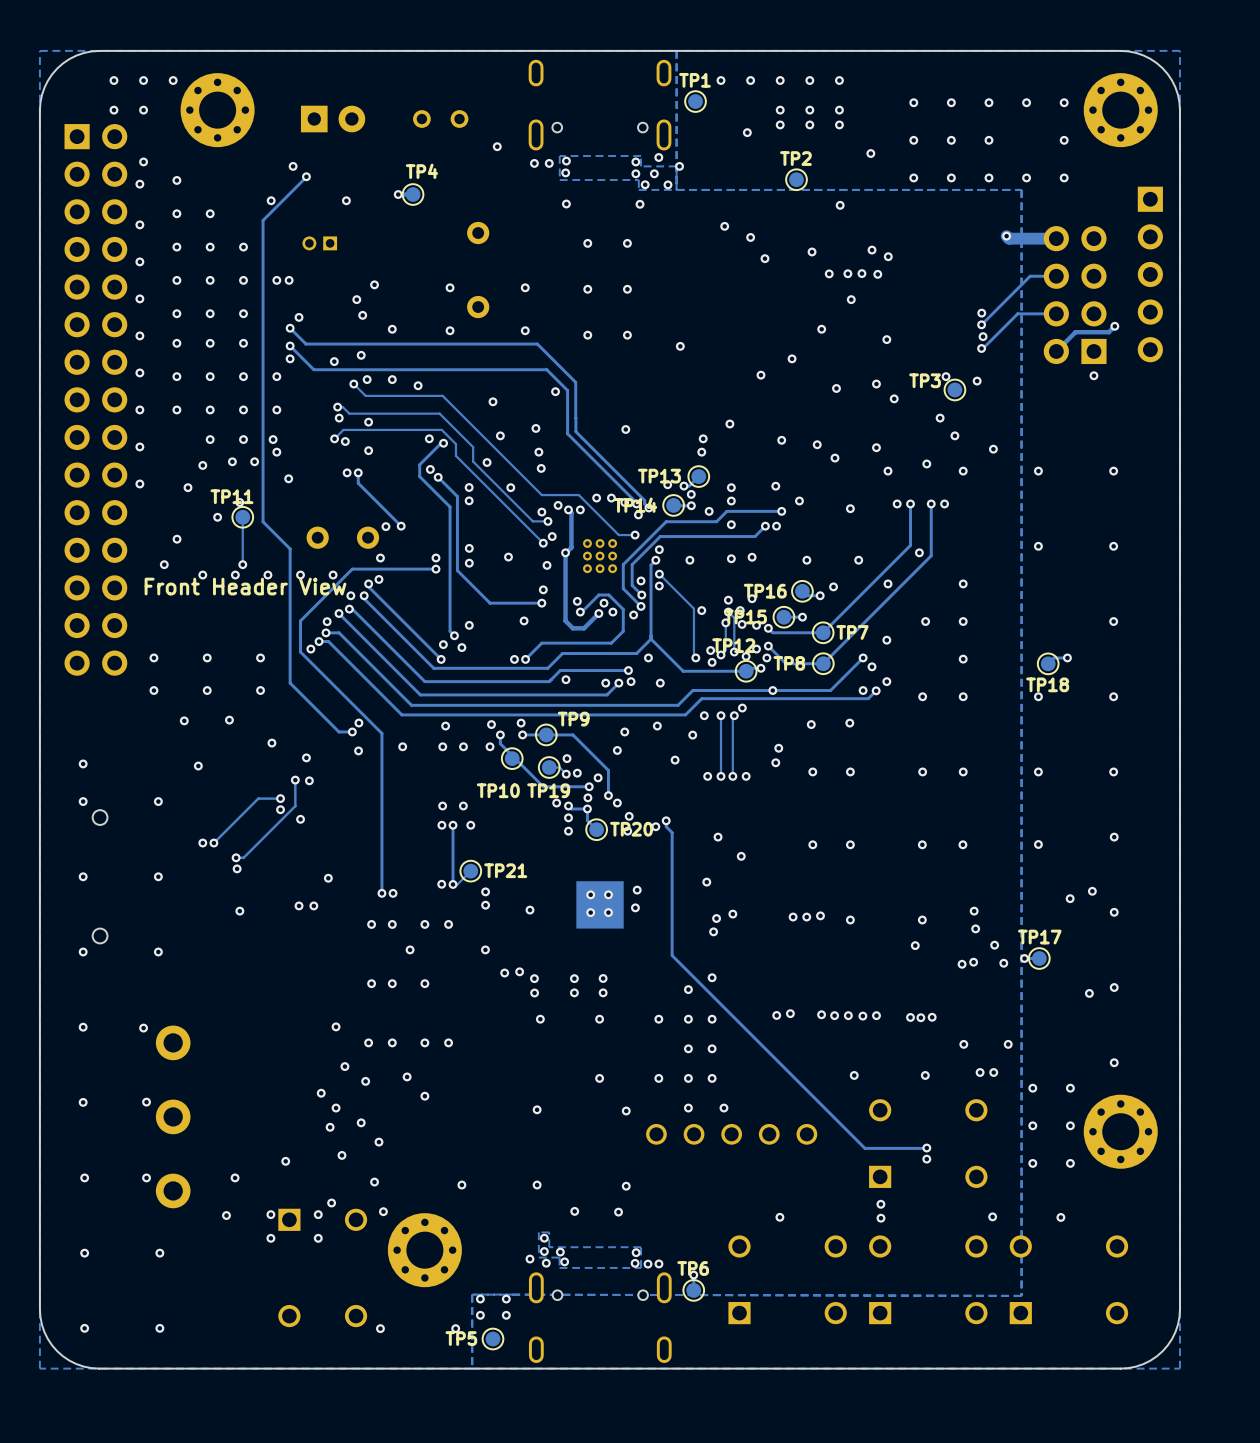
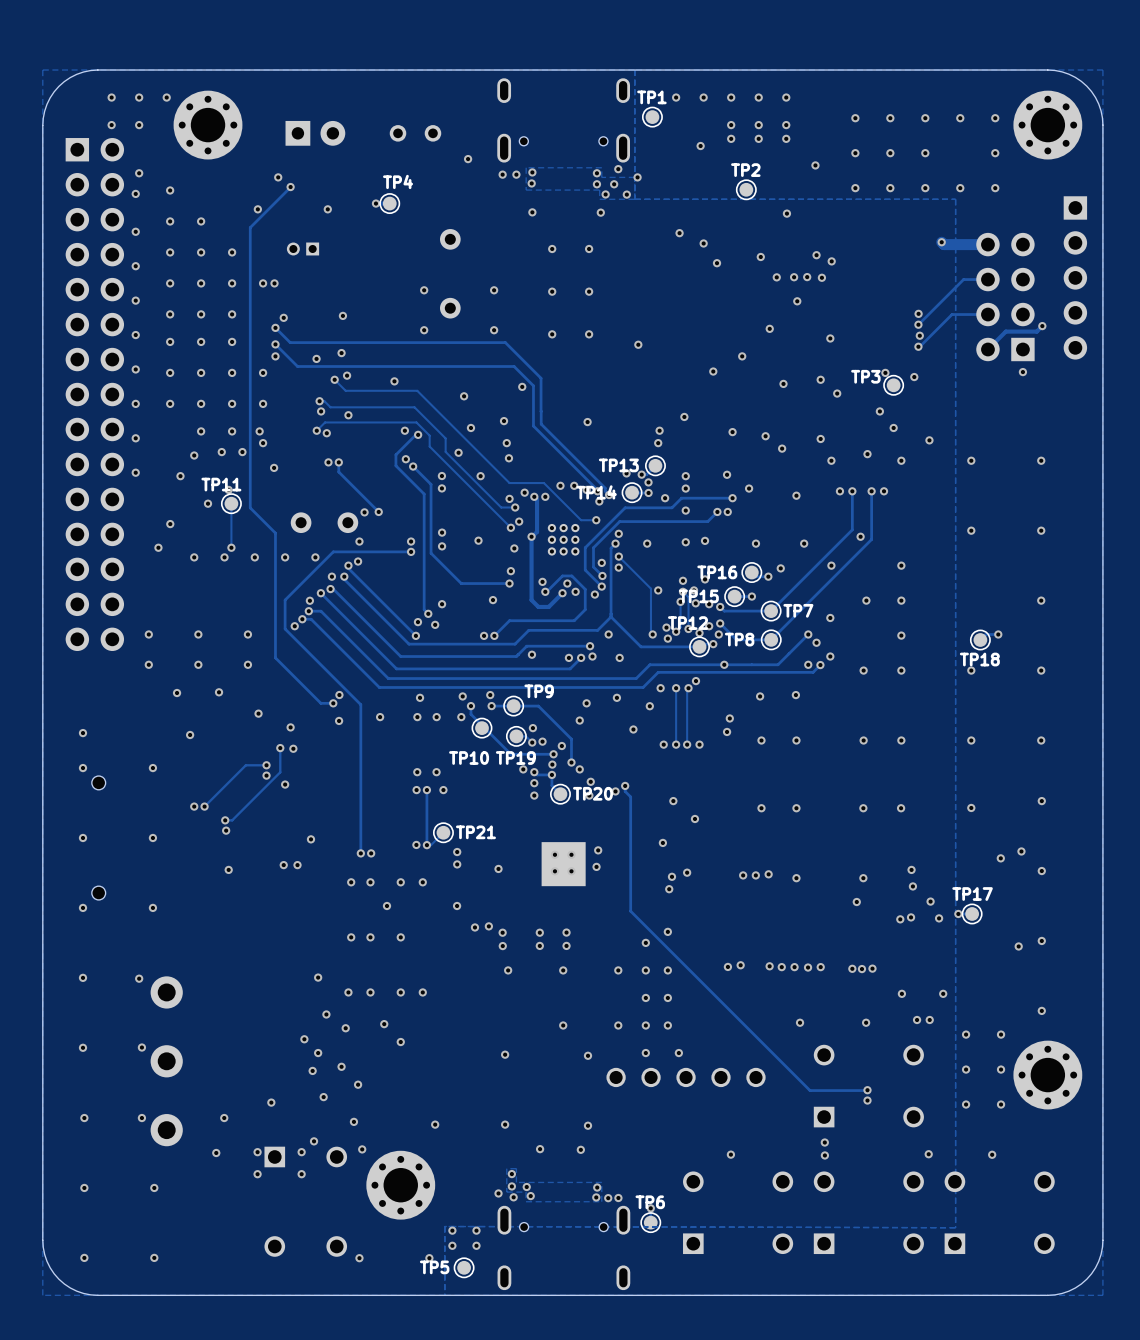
via: (374, 284) -> none
via: (356, 299) -> none
via: (392, 329) -> none
via: (392, 379) -> none
via: (368, 450) -> none
text: Front Header View (245, 586) -> none

